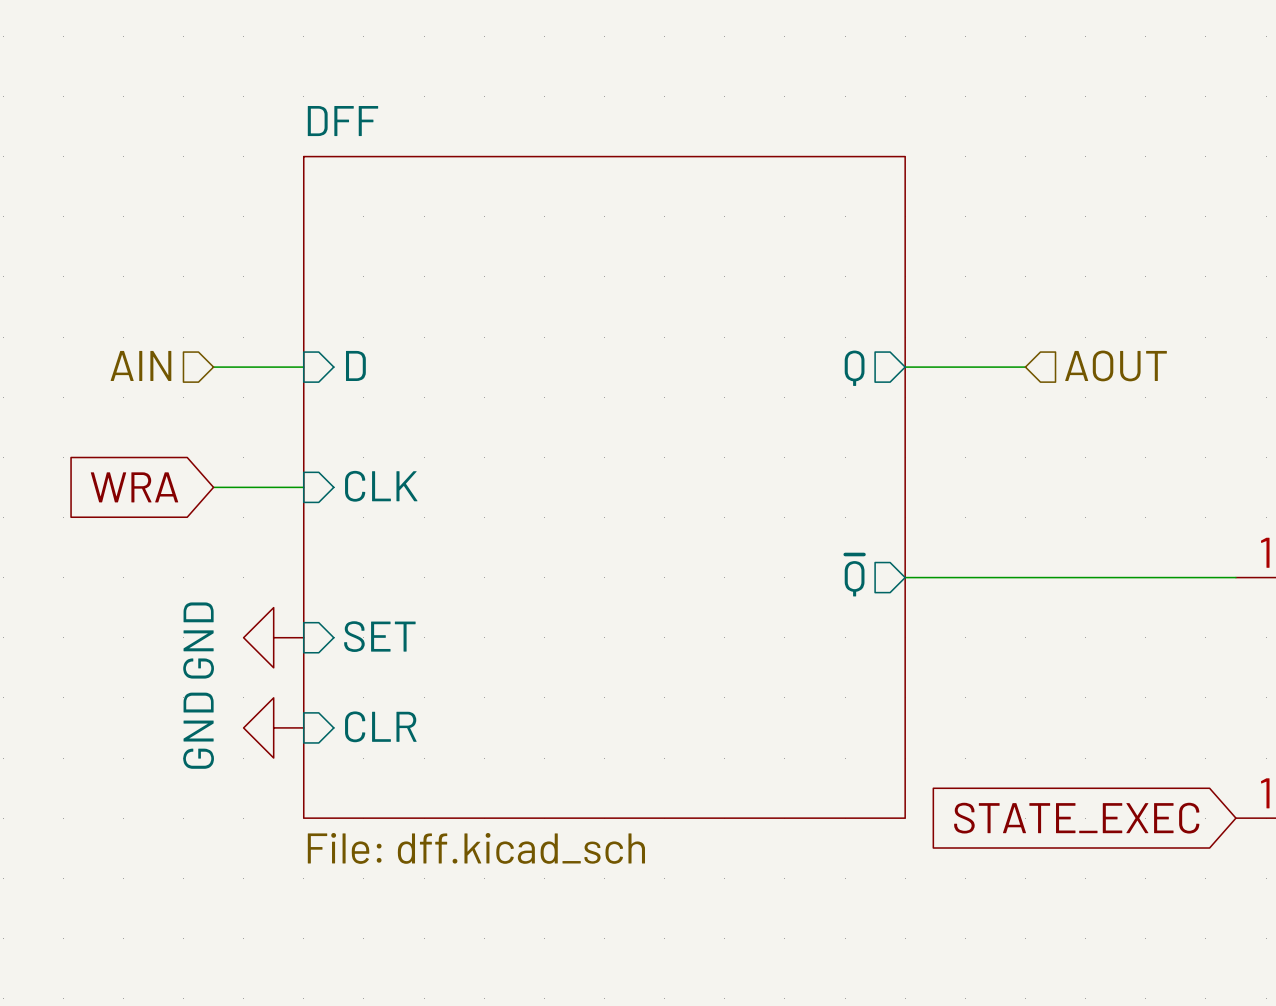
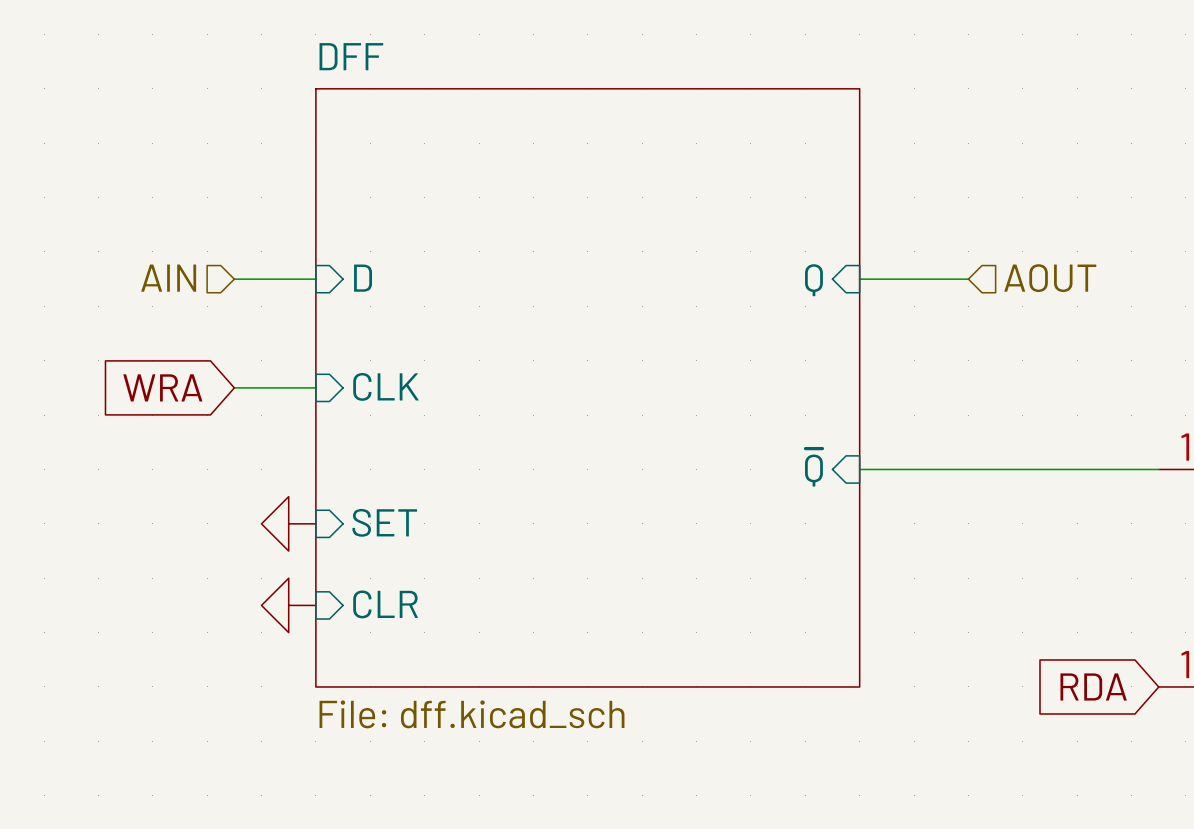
sheet pin shape: output (854, 368) -> input (813, 280)
sheet pin shape: output (854, 575) -> input (813, 467)
power symbol text: GND (198, 640) -> none
power symbol text: GND (198, 730) -> none
global label: STATE_EXEC (1076, 818) -> RDA (1093, 686)

